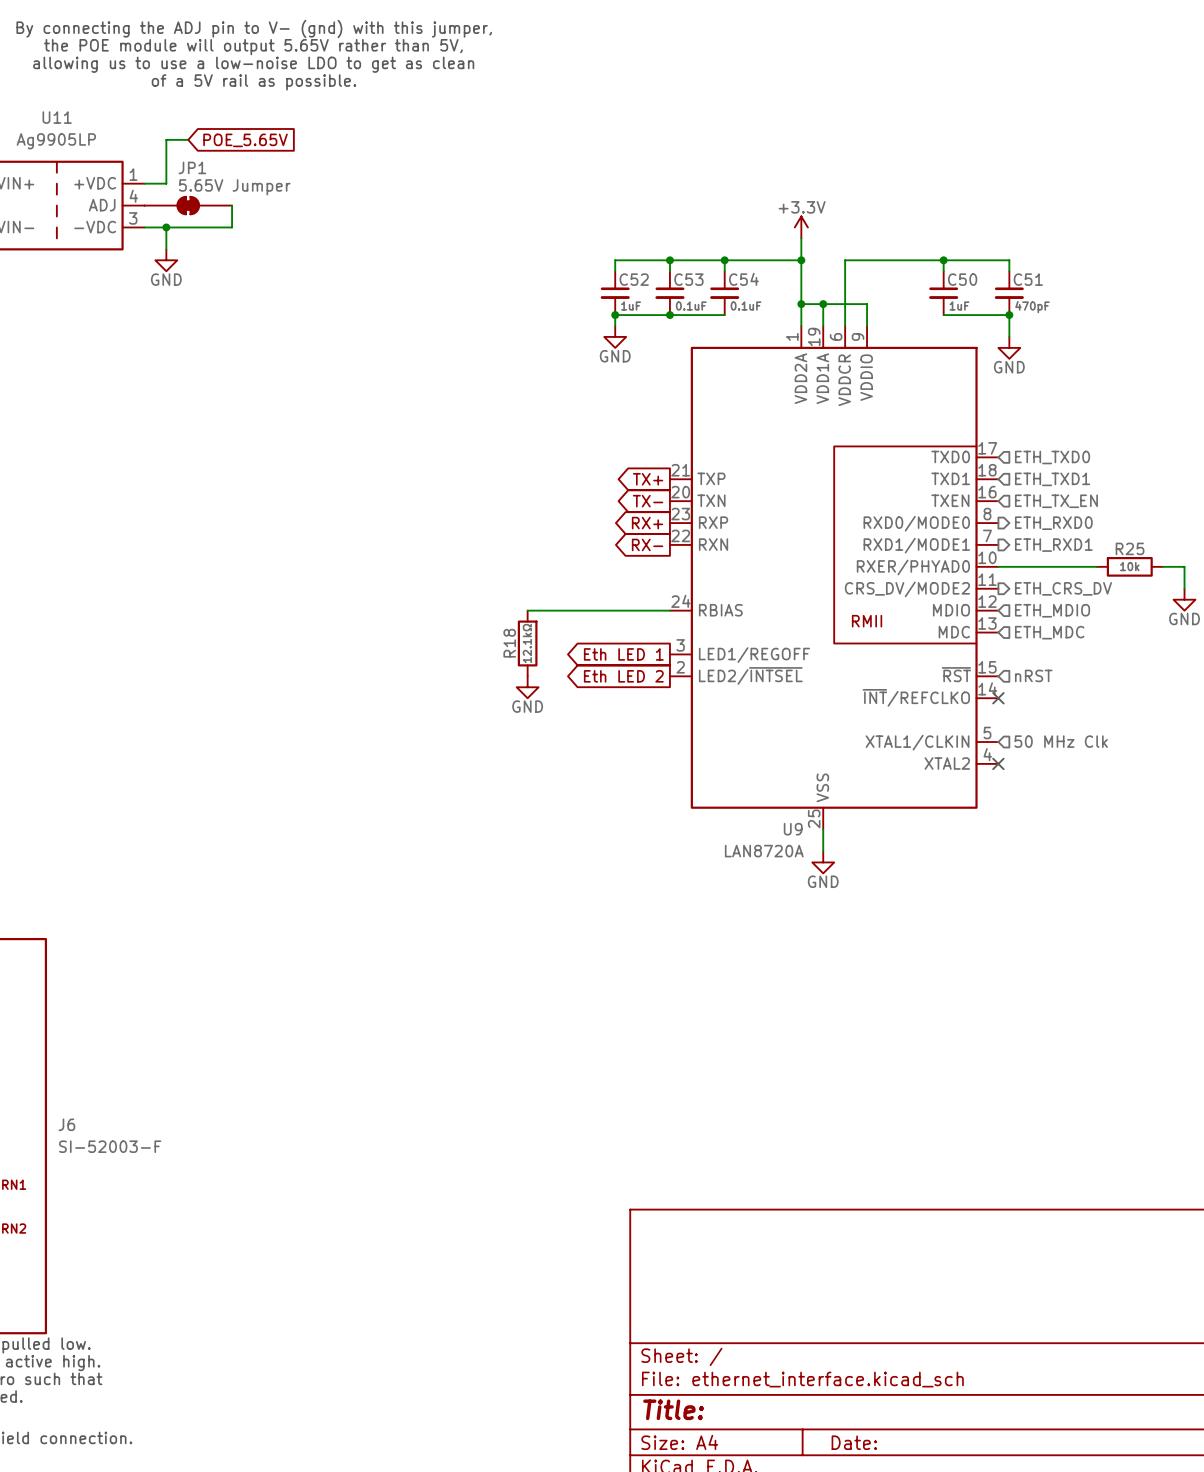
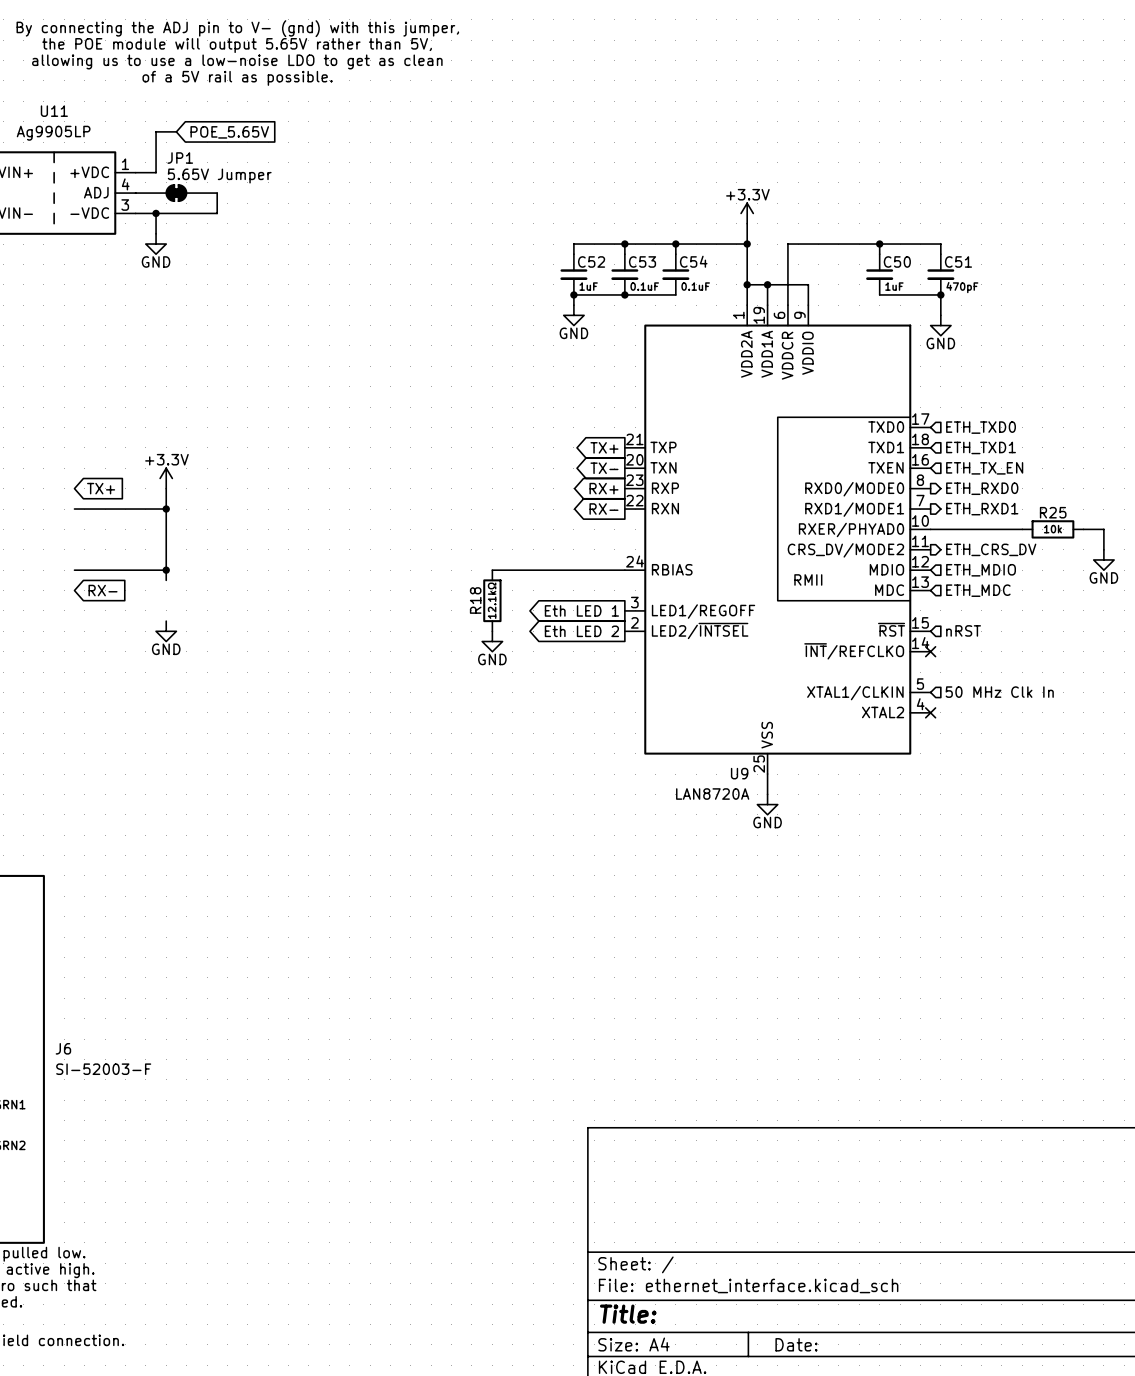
power symbol: none -> +3.3V (166, 478)
global label: none -> TX+ (101, 488)
wire: none -> (166, 488) (166, 580)
wire: none -> (74, 509) (166, 509)
junction: none -> (166, 509)
wire: none -> (74, 570) (166, 570)
junction: none -> (166, 570)
global label: none -> RX- (103, 590)
power symbol: none -> GND (166, 631)
hierarchical label: 50 MHz Clk (1061, 741) -> 50 MHz Clk In (999, 692)

